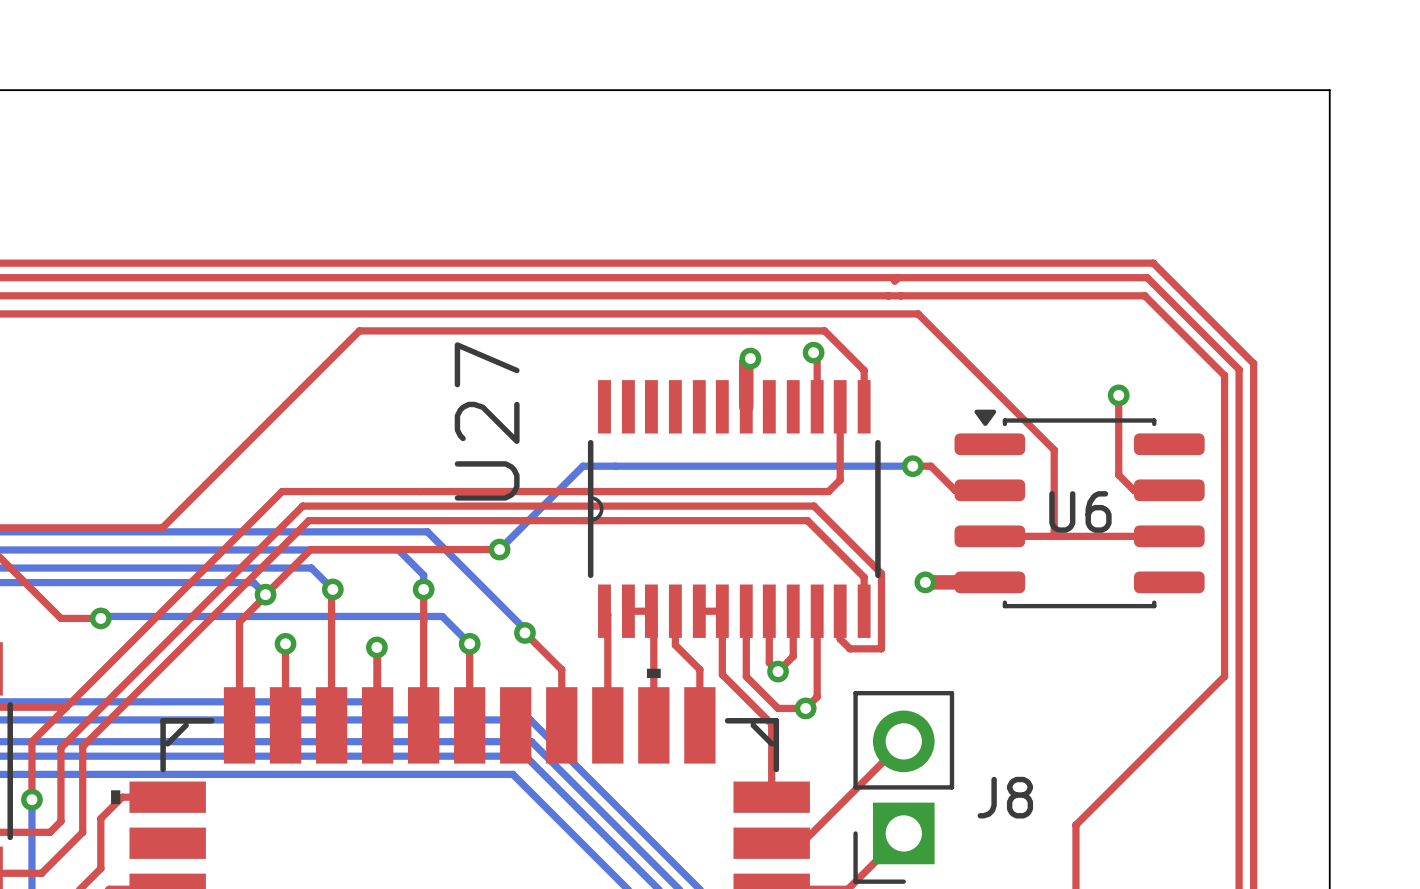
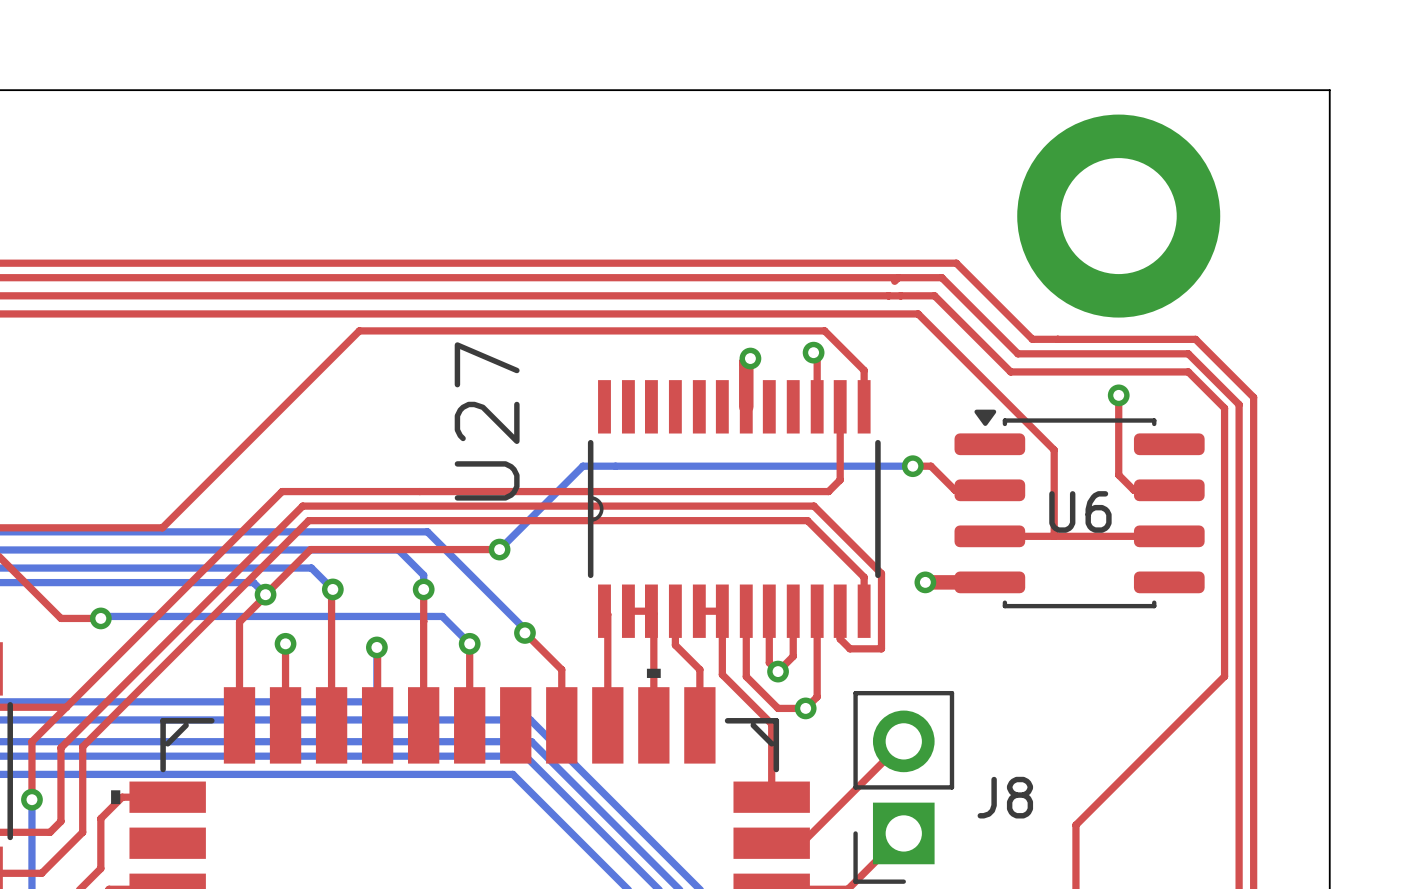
part: none -> (1118, 216)
top track: (956, 263) (1153, 263) (1253, 363) (1253, 397) -> (956, 263) (1032, 339) (1195, 339) (1253, 397)
top track: (941, 277) (1147, 277) (1239, 369) (1239, 404) -> (941, 277) (1017, 353) (1188, 353) (1239, 404)
top track: (934, 295) (1144, 295) (1224, 375) (1224, 408) -> (934, 295) (1010, 371) (1188, 371) (1224, 408)

